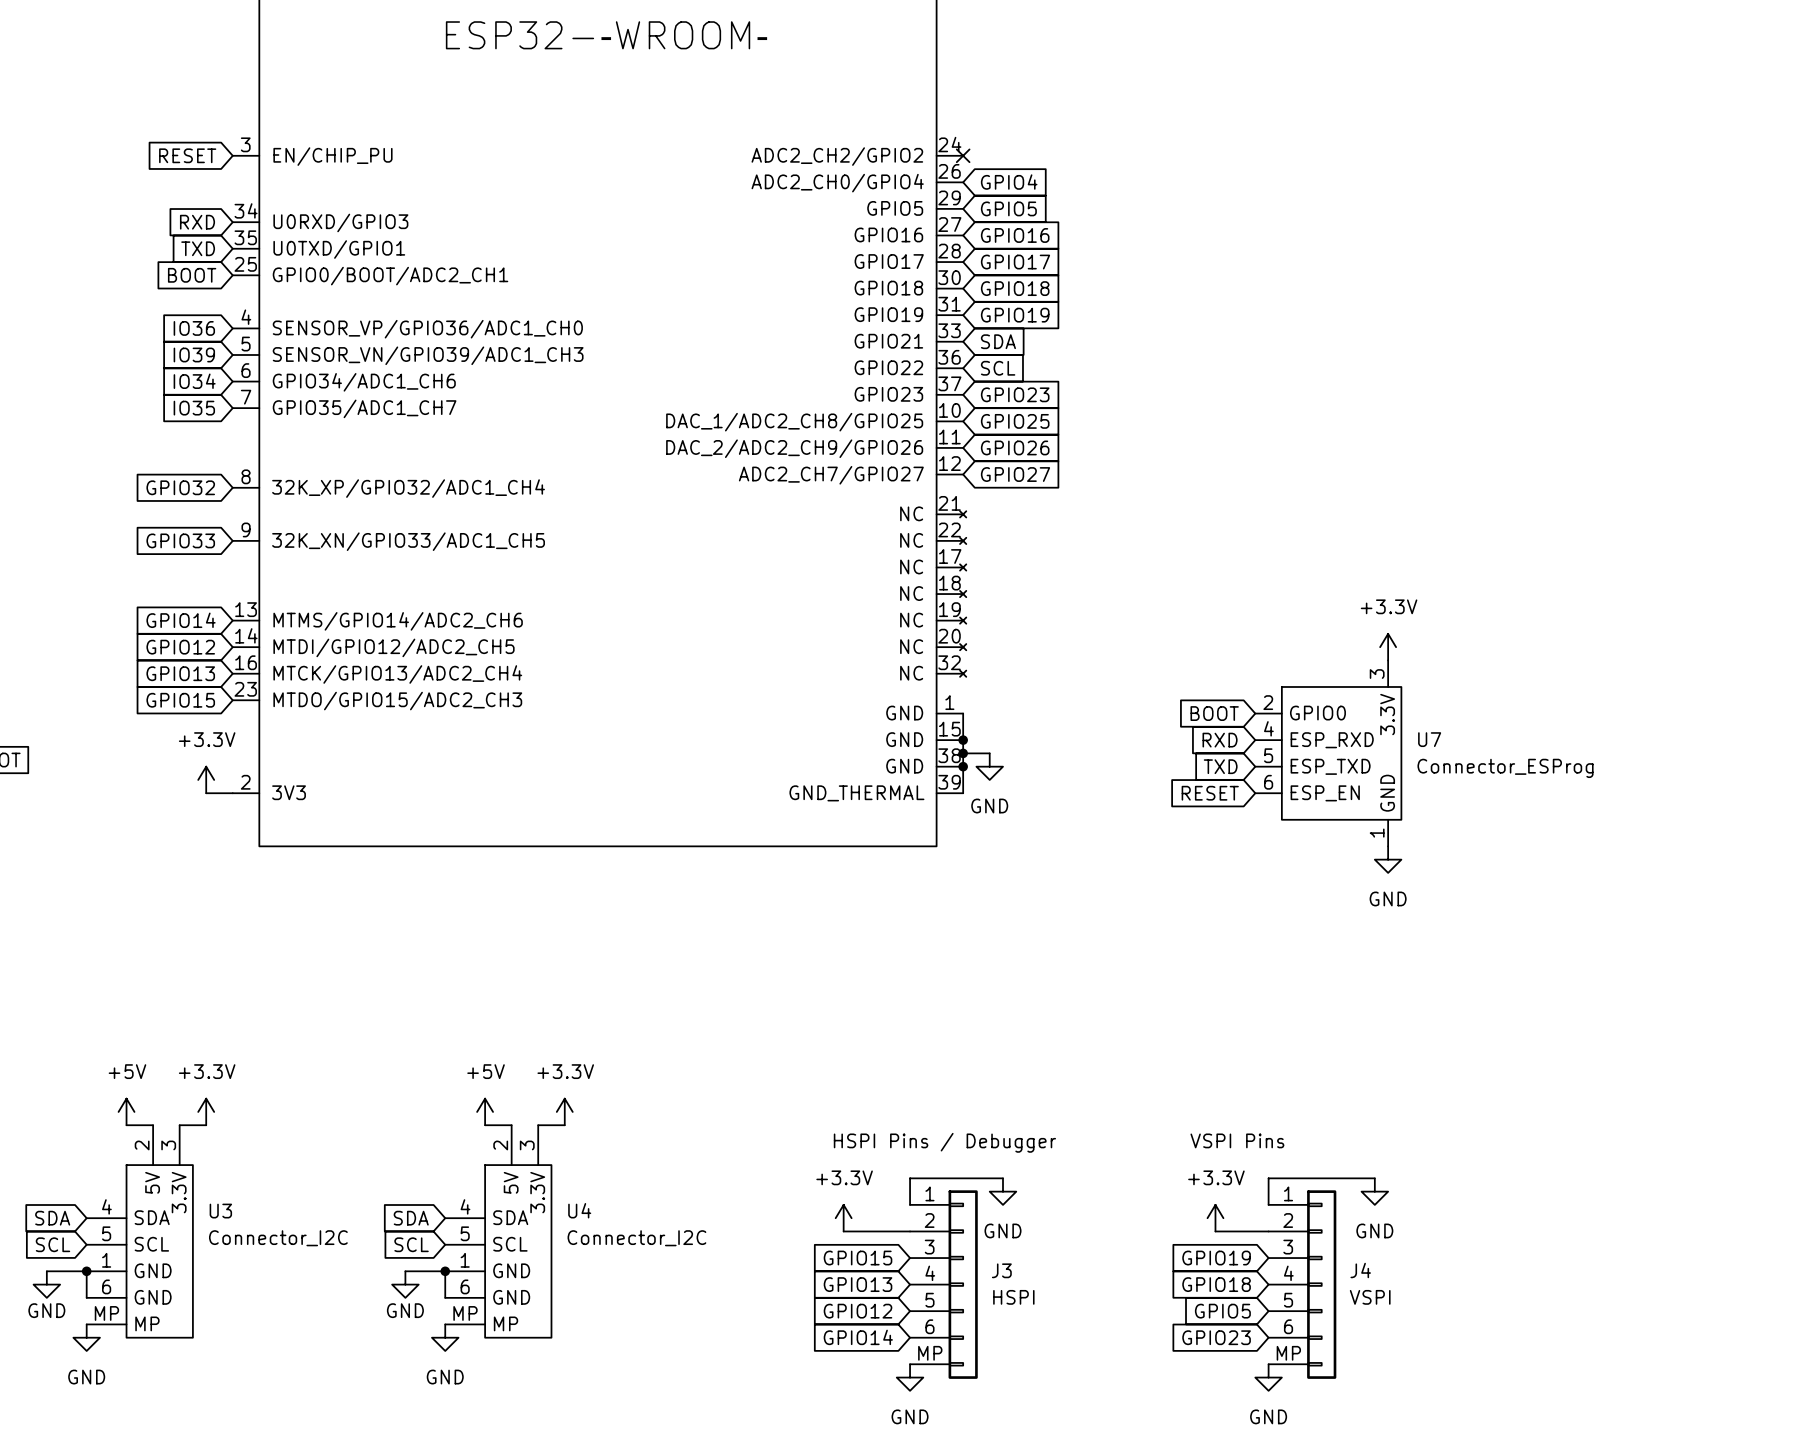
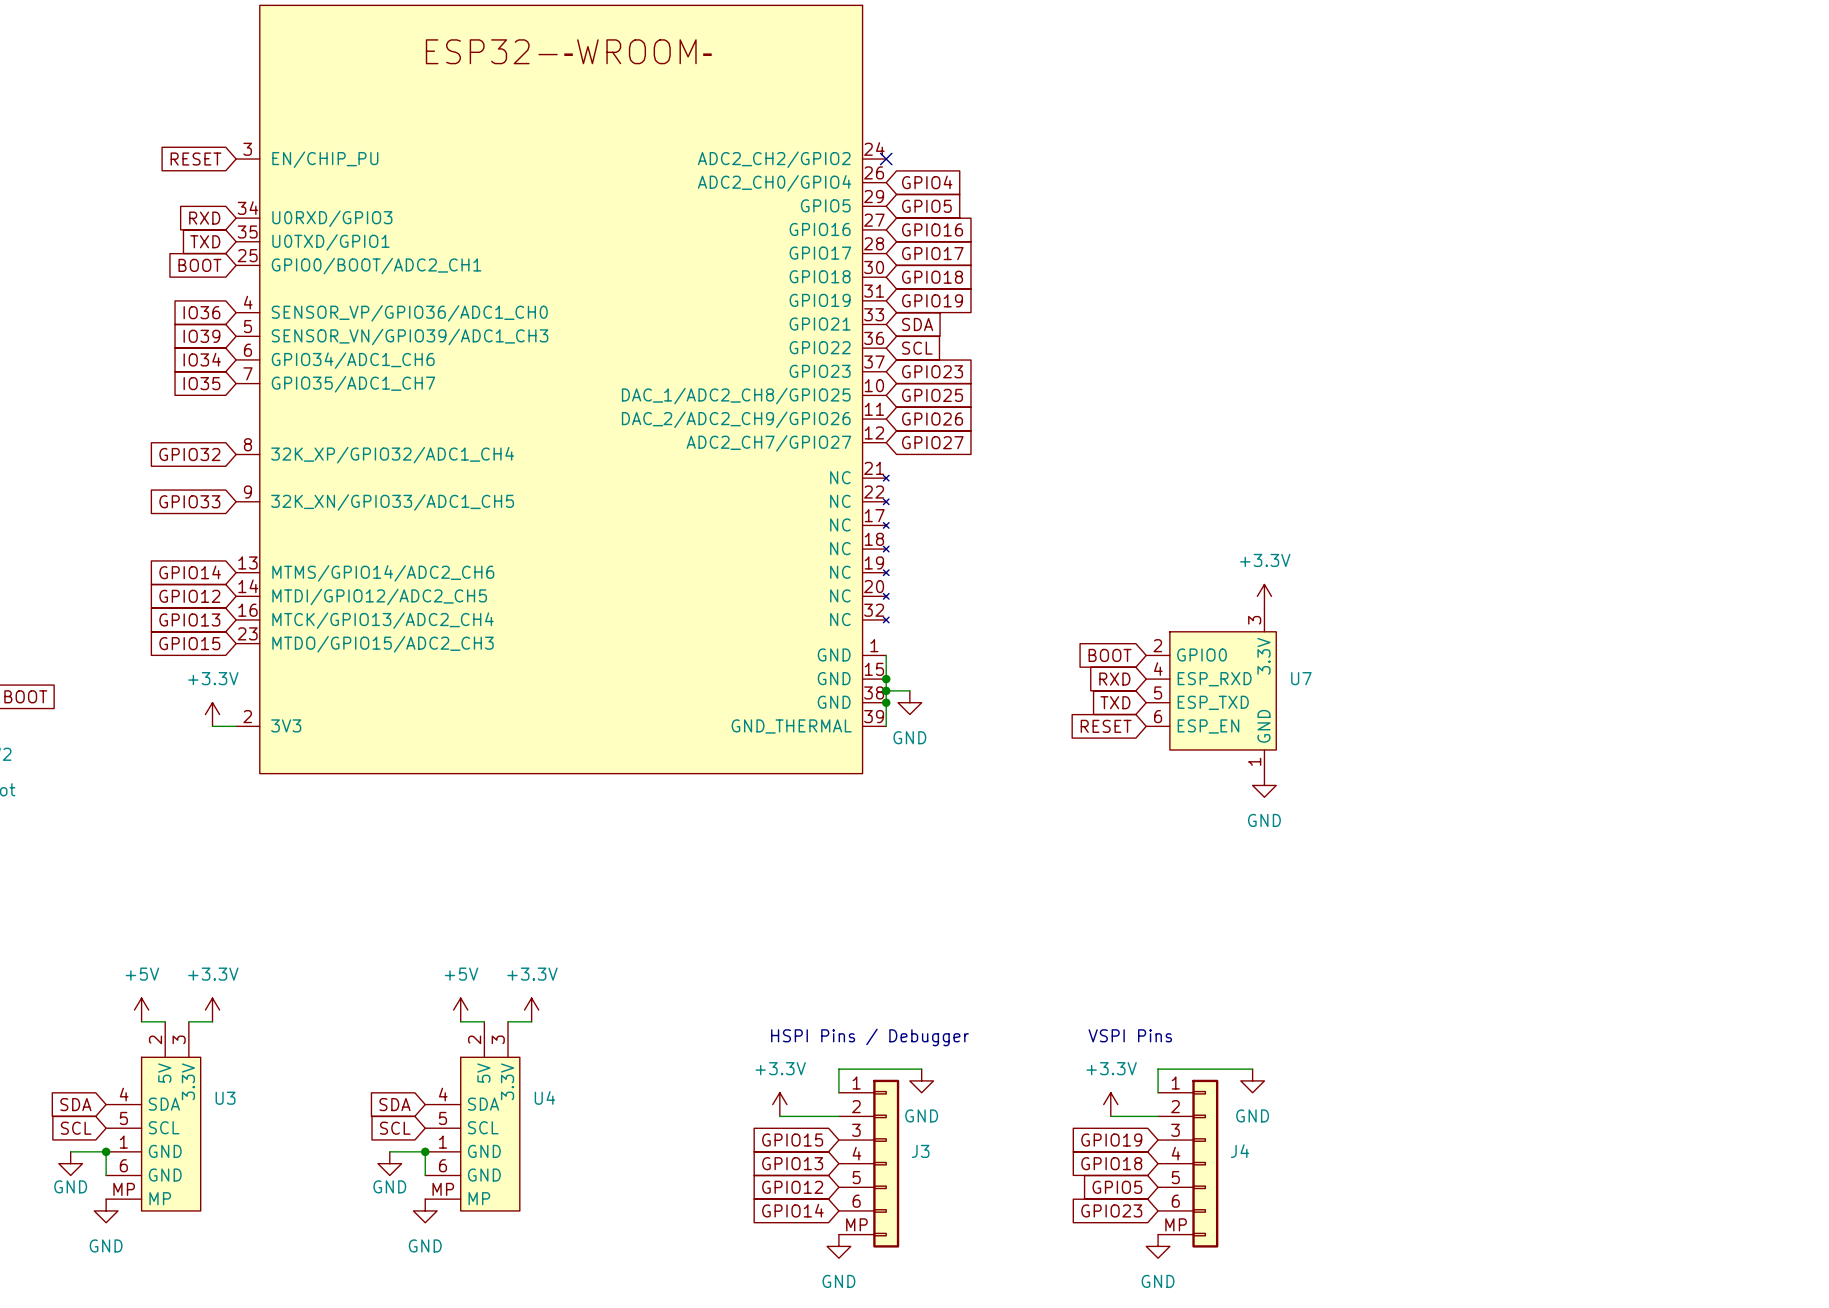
U7 value: Connector_ESProg (1505, 768) -> none
U3 value: Connector_I2C (278, 1238) -> none
U4 value: Connector_I2C (636, 1238) -> none
J3 value: HSPI (1013, 1297) -> none
J4 value: VSPI (1370, 1297) -> none

